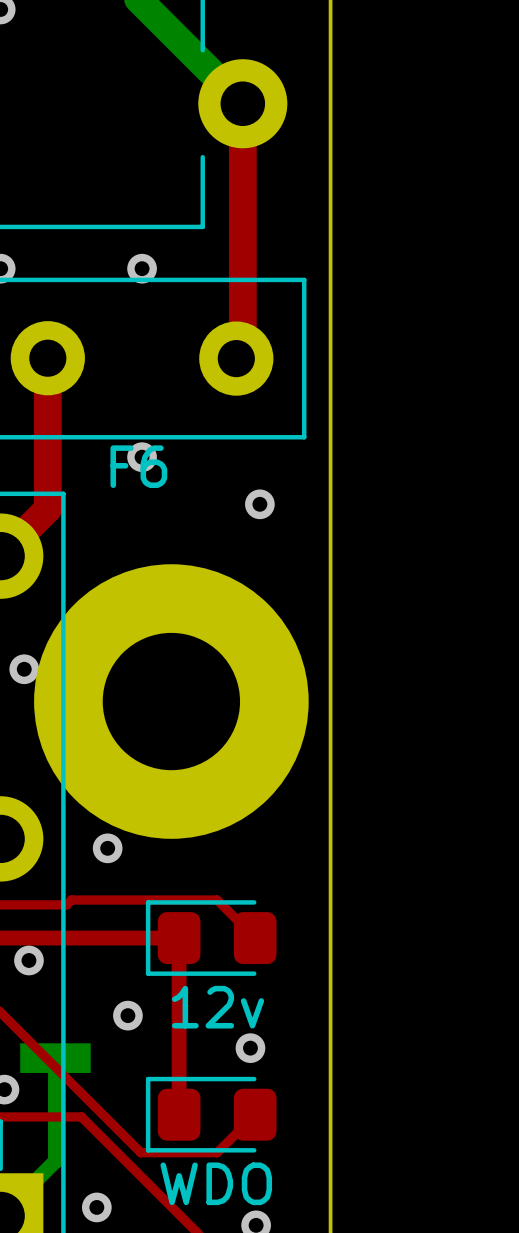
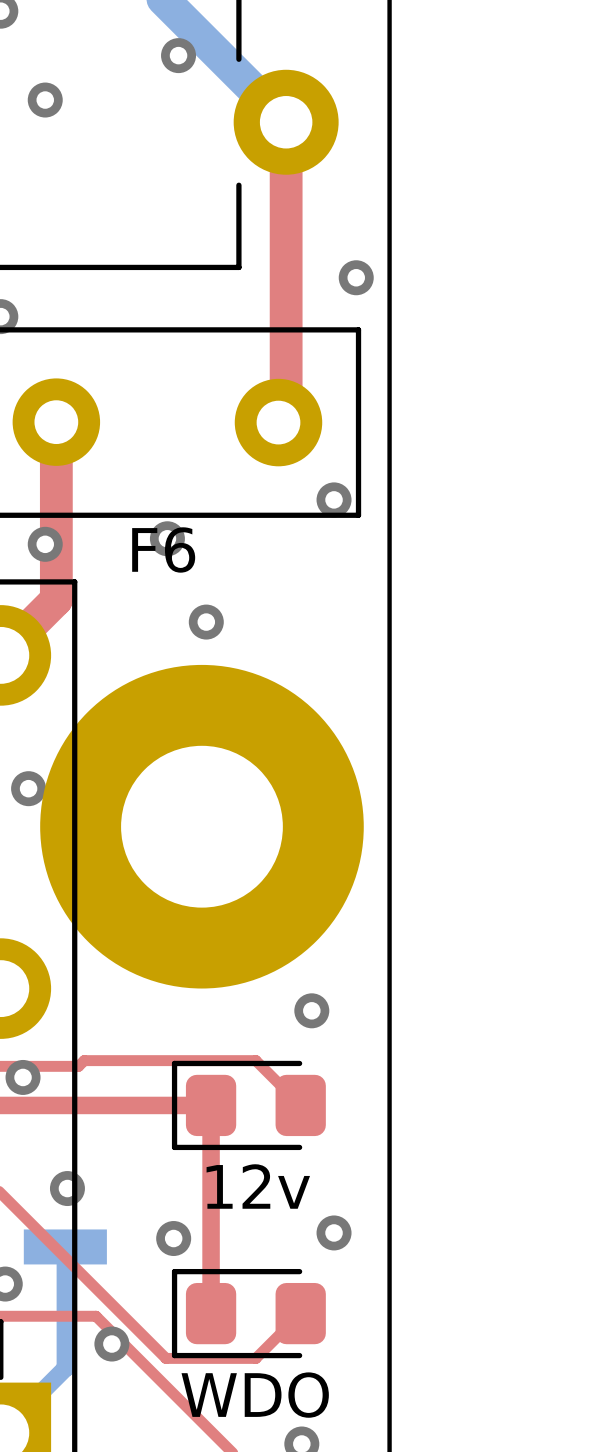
via: none -> (178, 55)
via: none -> (45, 100)
via: none -> (356, 277)
via: (142, 268) -> none
via: none -> (334, 499)
via: none -> (45, 544)
via: (259, 504) -> none
via: none -> (206, 622)
via: (107, 848) -> none
via: none -> (311, 1010)
via: none -> (23, 1077)
via: (28, 960) -> none
via: none -> (67, 1188)
via: (127, 1015) -> none
via position: (250, 1048) -> (334, 1232)
via: none -> (173, 1238)
via: none -> (111, 1344)
via: (96, 1207) -> none

